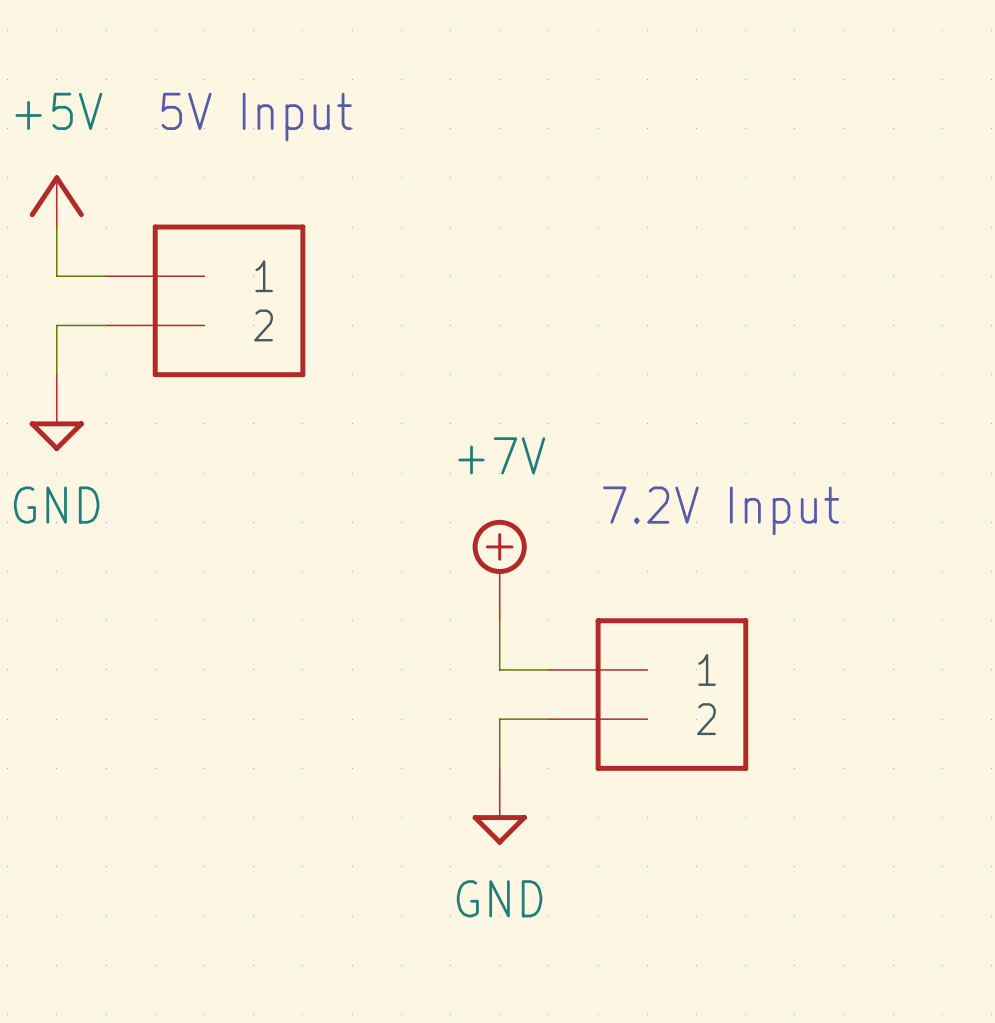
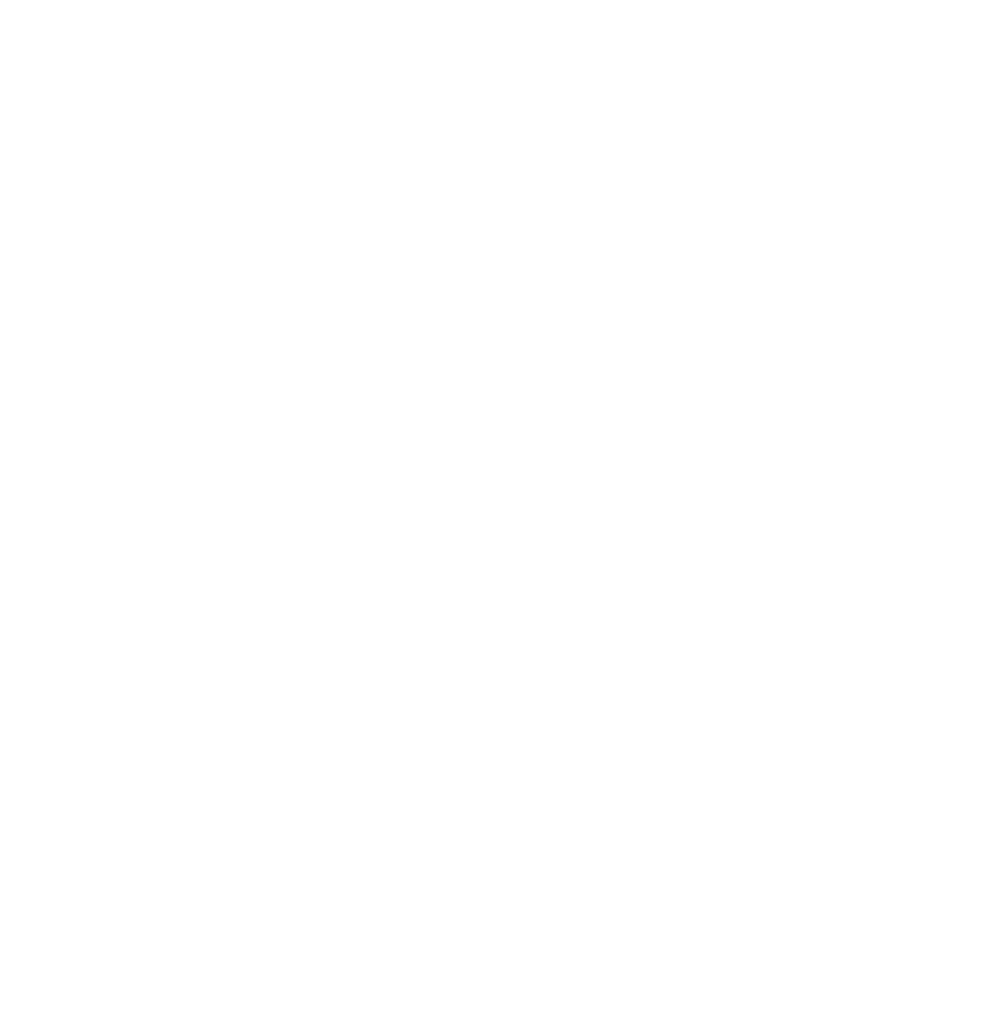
text: 5V Input (256, 117) -> none
power symbol: +5V (56, 201) -> none
wire: (56, 227) (56, 276) (106, 276) -> none
part: (205, 300) -> none
wire: (106, 325) (56, 325) (56, 374) -> none
power symbol: GND (56, 412) -> none
text: 7.2V Input (721, 510) -> none
power symbol: +7V (499, 570) -> none
wire: (499, 620) (499, 669) (548, 669) -> none
part: (648, 694) -> none
wire: (548, 719) (499, 719) (499, 768) -> none
power symbol: GND (499, 806) -> none

